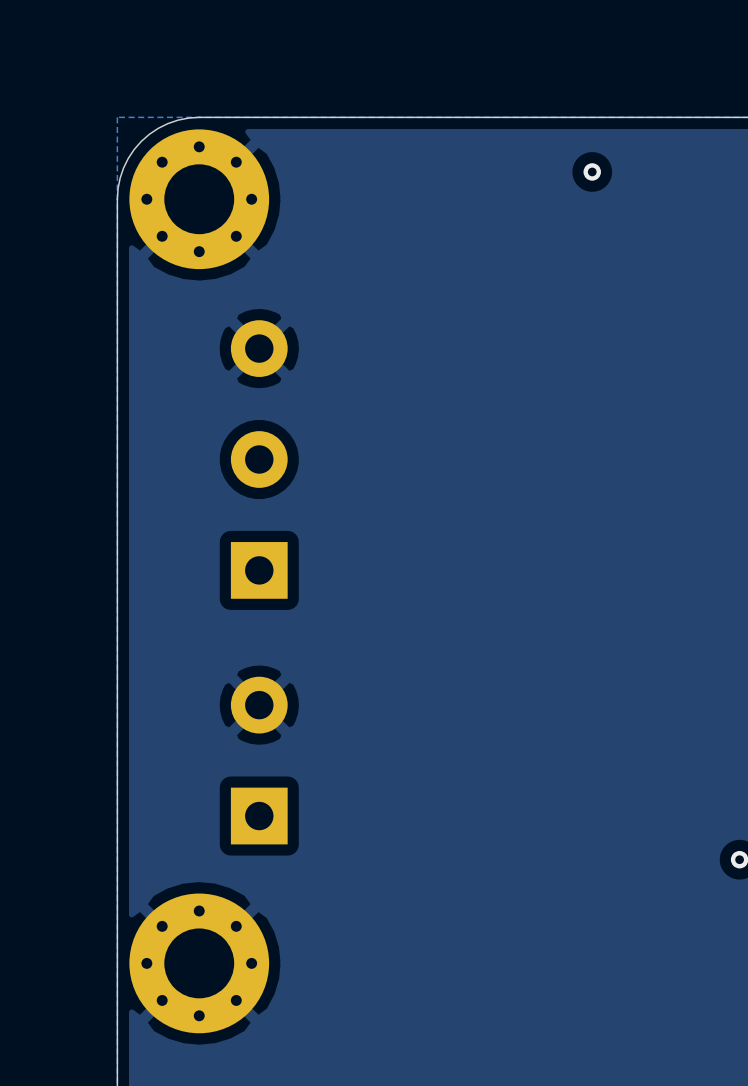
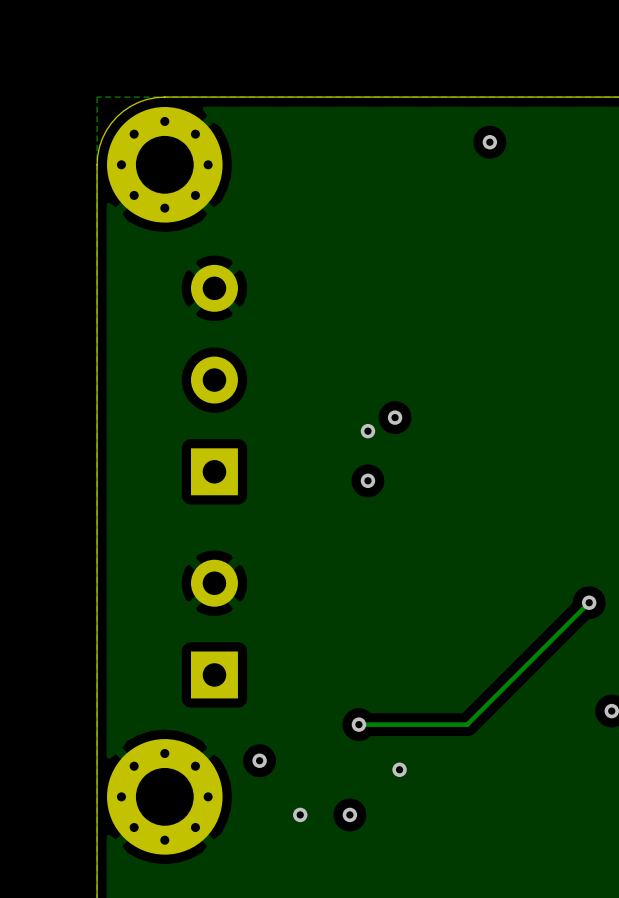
via: none -> (395, 417)
via: none -> (367, 431)
via: none -> (367, 480)
track: none -> (589, 602) (467, 724) (358, 724)
via: none -> (589, 602)
via: none -> (358, 724)
via: none -> (259, 760)
via: none -> (399, 769)
via: none -> (300, 814)
via: none -> (349, 814)

